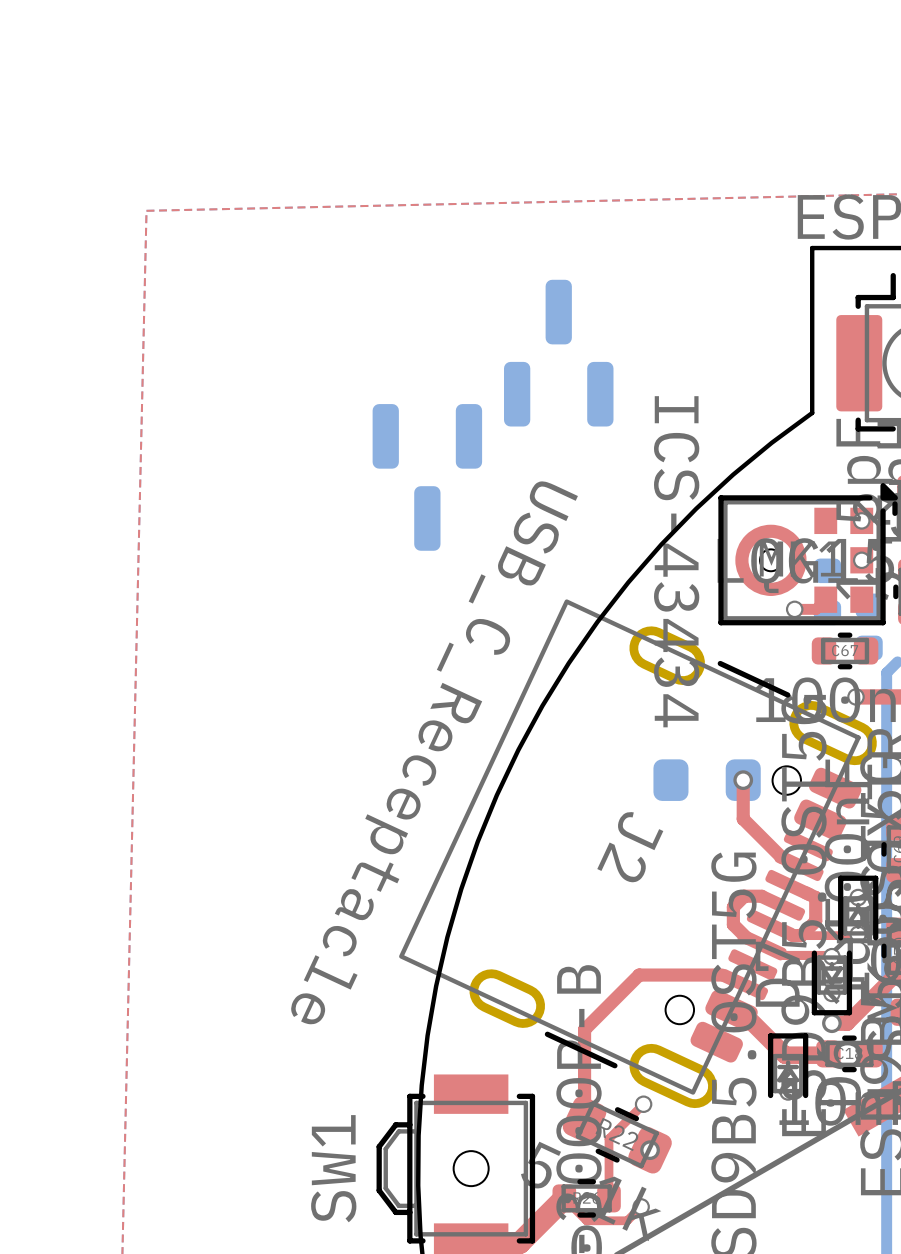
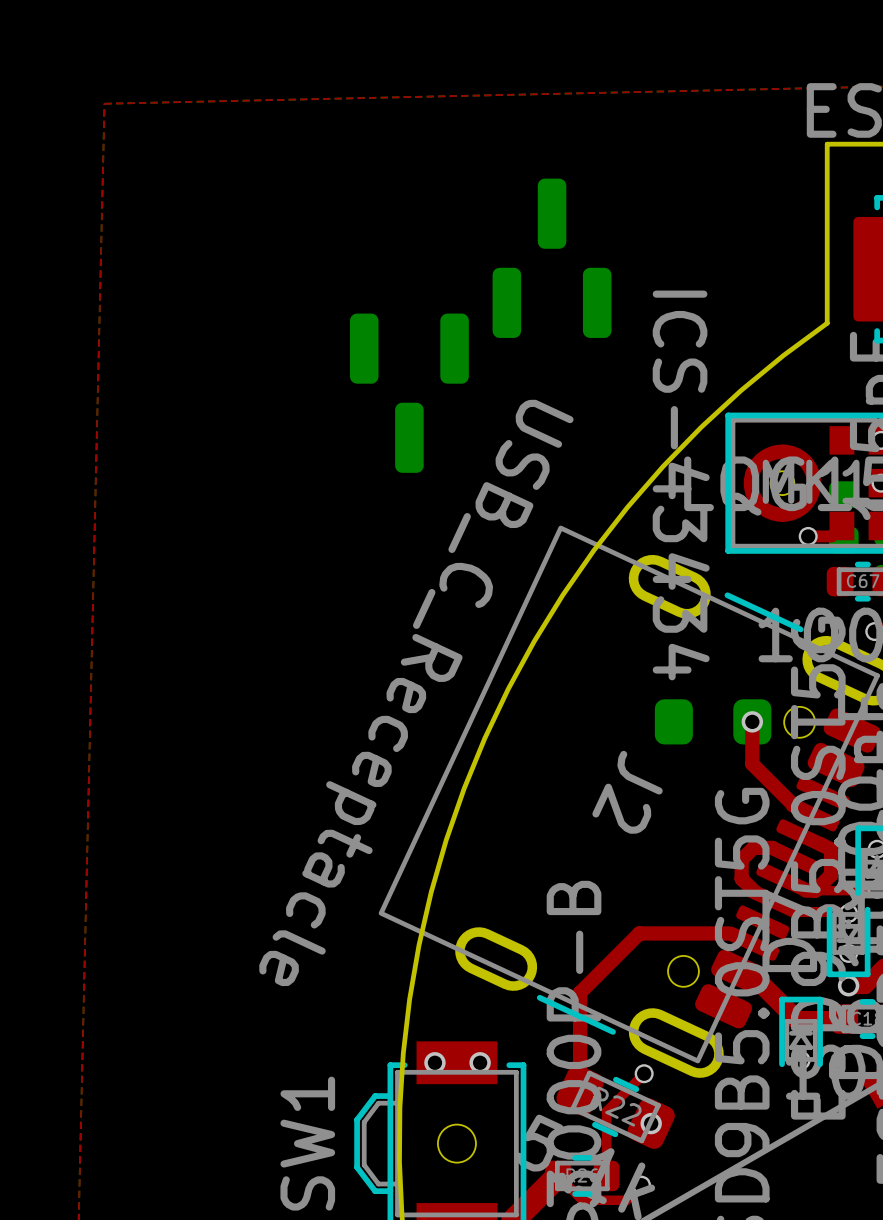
via: none -> (434, 1062)
via: none -> (480, 1062)

